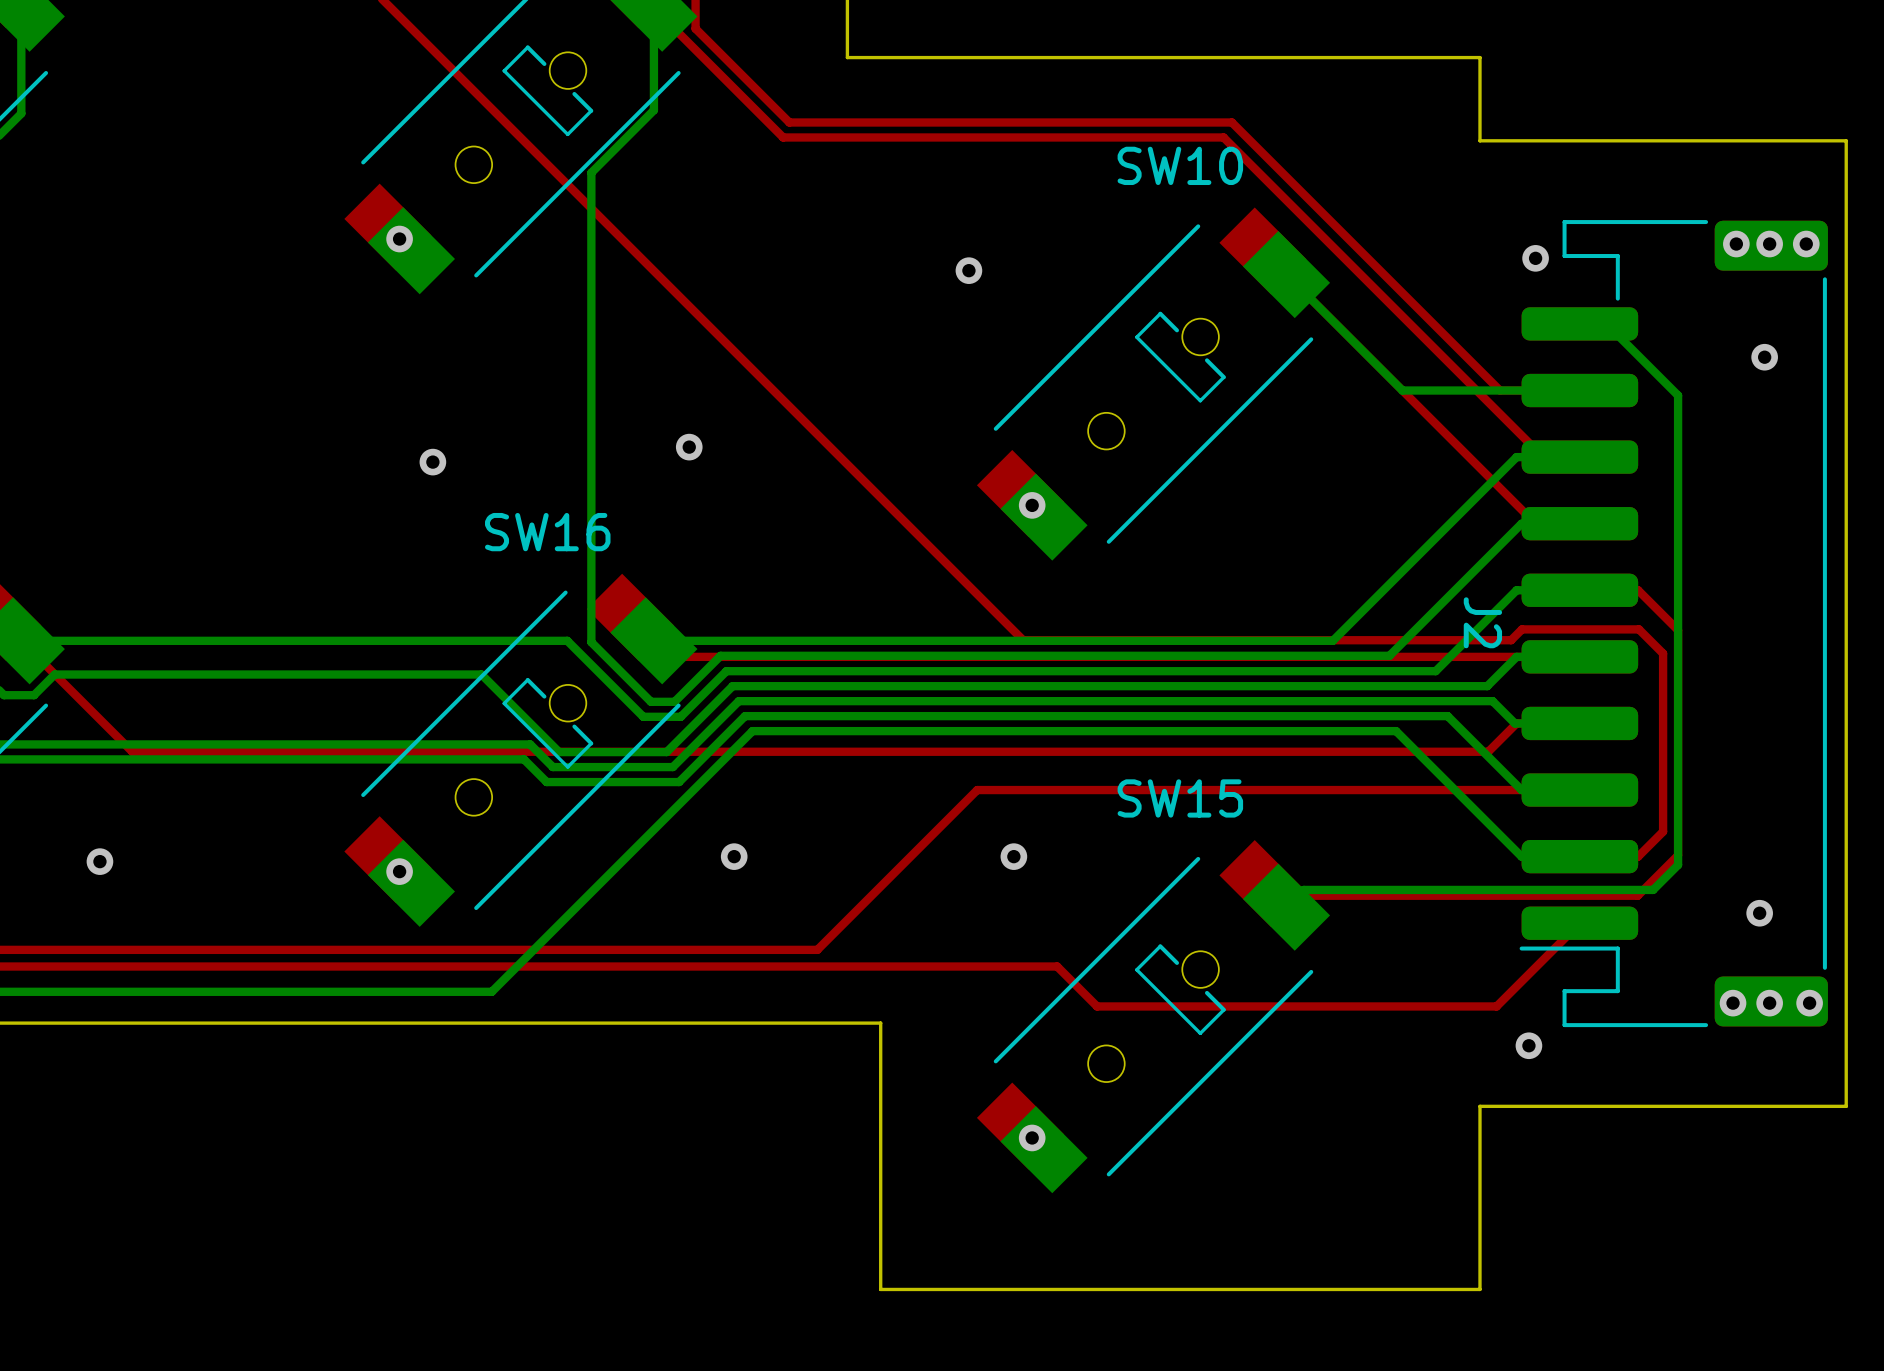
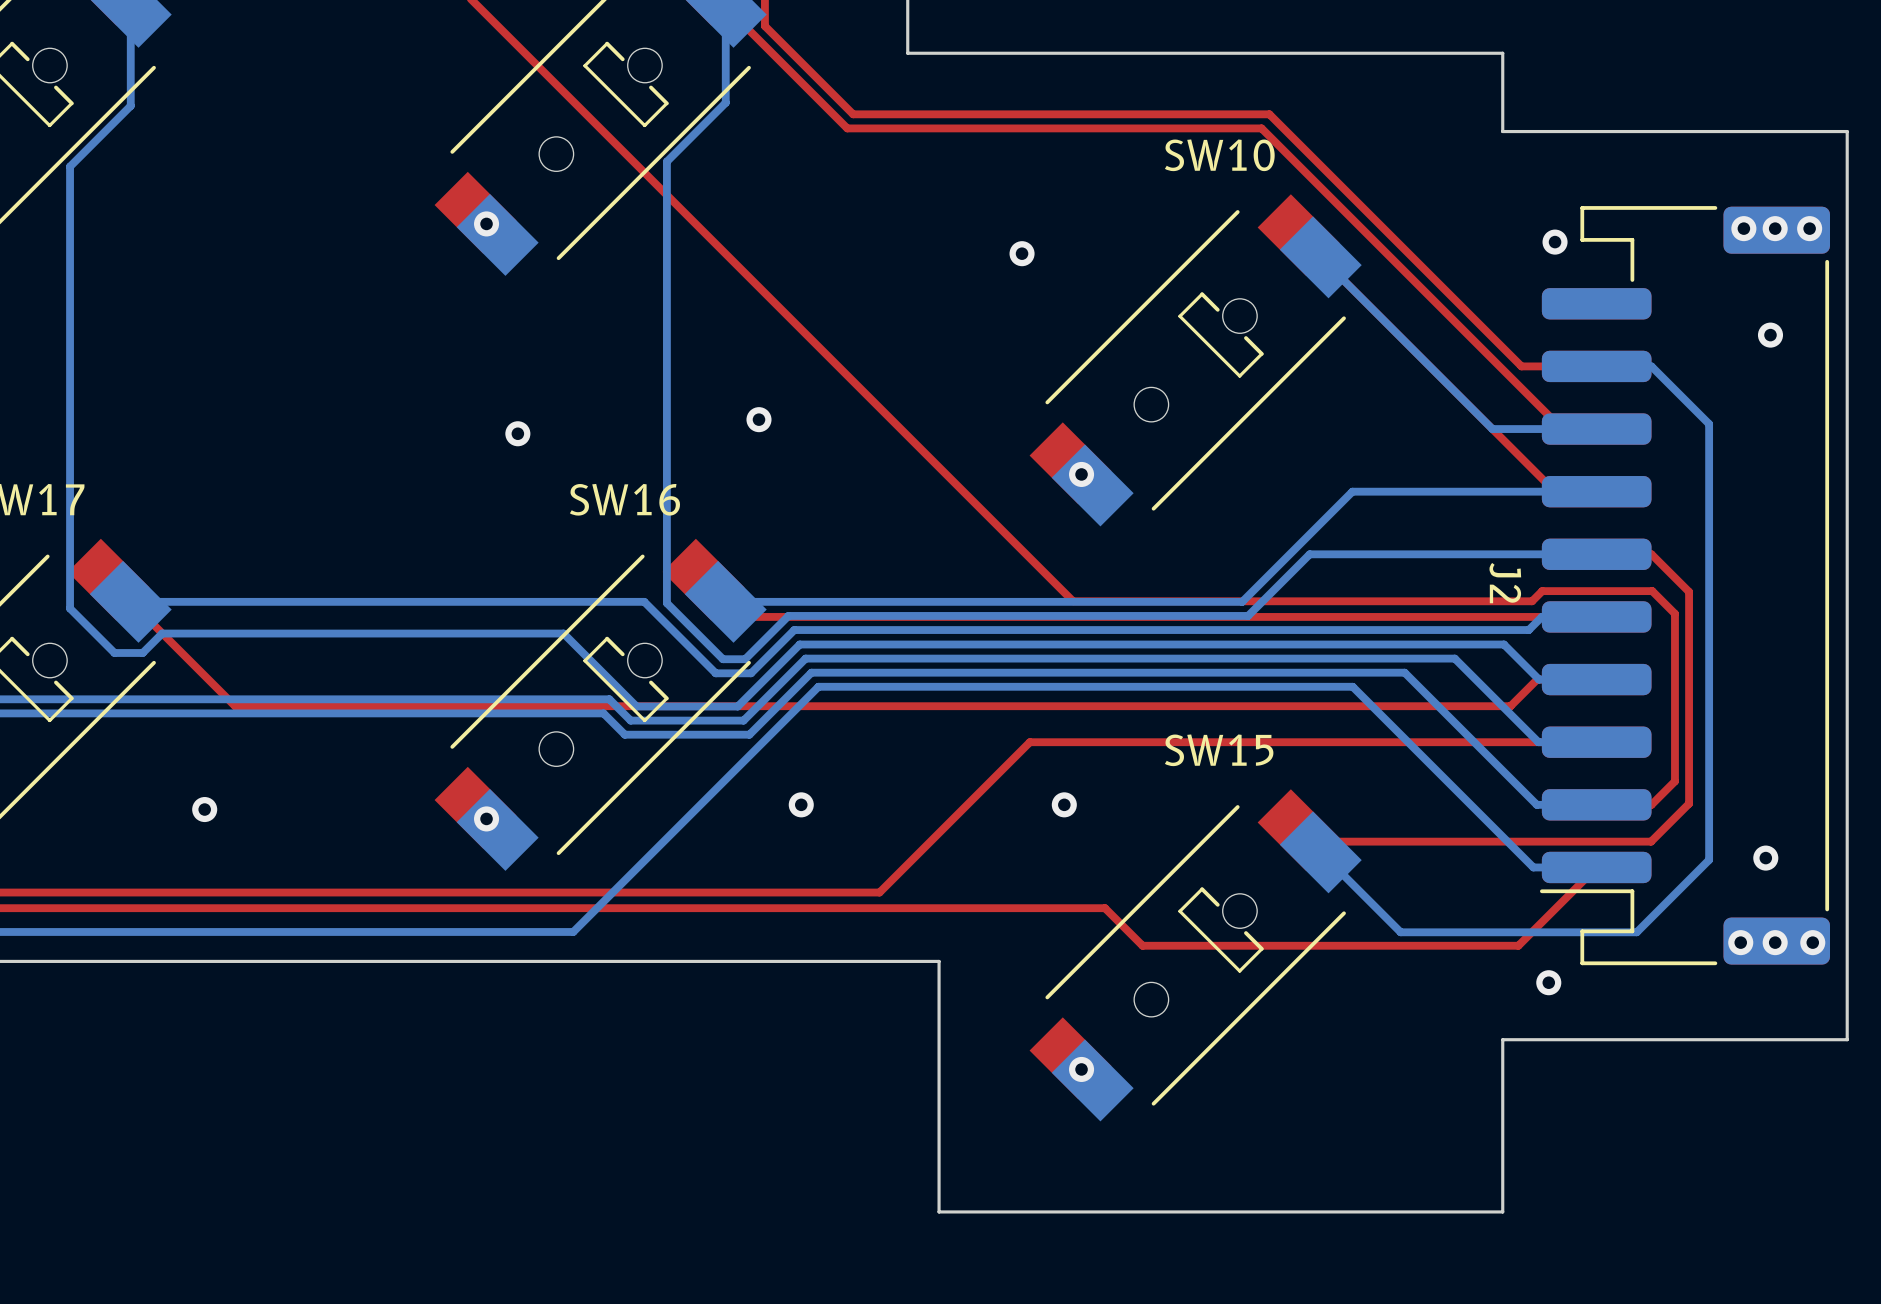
bottom track: (1579, 323) (1606, 323) (1678, 395) (1678, 864) (1653, 889) (1303, 889) (1286, 907) -> (1596, 366) (1651, 366) (1709, 424) (1709, 859) (1636, 932) (1400, 932) (1320, 852)
bottom track: (1579, 390) (1402, 390) -> (1537, 429) (1492, 429) (1429, 366)
bottom track: (1516, 457) (1332, 640) (1203, 640) -> none
bottom track: (1521, 523) (1389, 655) (1209, 655) -> (1541, 491) (1352, 491) (1242, 601)
bottom track: (1516, 590) (1435, 671) (726, 671) -> (1541, 616) (1528, 630) (794, 630)
bottom track: none -> (1537, 554) (1309, 554) (1248, 615)
bottom track: (1521, 656) (1516, 656) (1487, 686) (1481, 686) -> none
bottom track: (1429, 701) (1492, 701) (1514, 723) (1518, 723) -> (1503, 644) (1539, 679)
bottom track: (1375, 716) (1447, 716) (1521, 790) -> (1454, 658) (1538, 742) (1541, 742)
bottom track: (1320, 731) (1396, 731) (1521, 856) -> (1404, 672) (1536, 804) (1541, 804)
bottom track: none -> (1352, 686) (1533, 867) (1596, 867)

